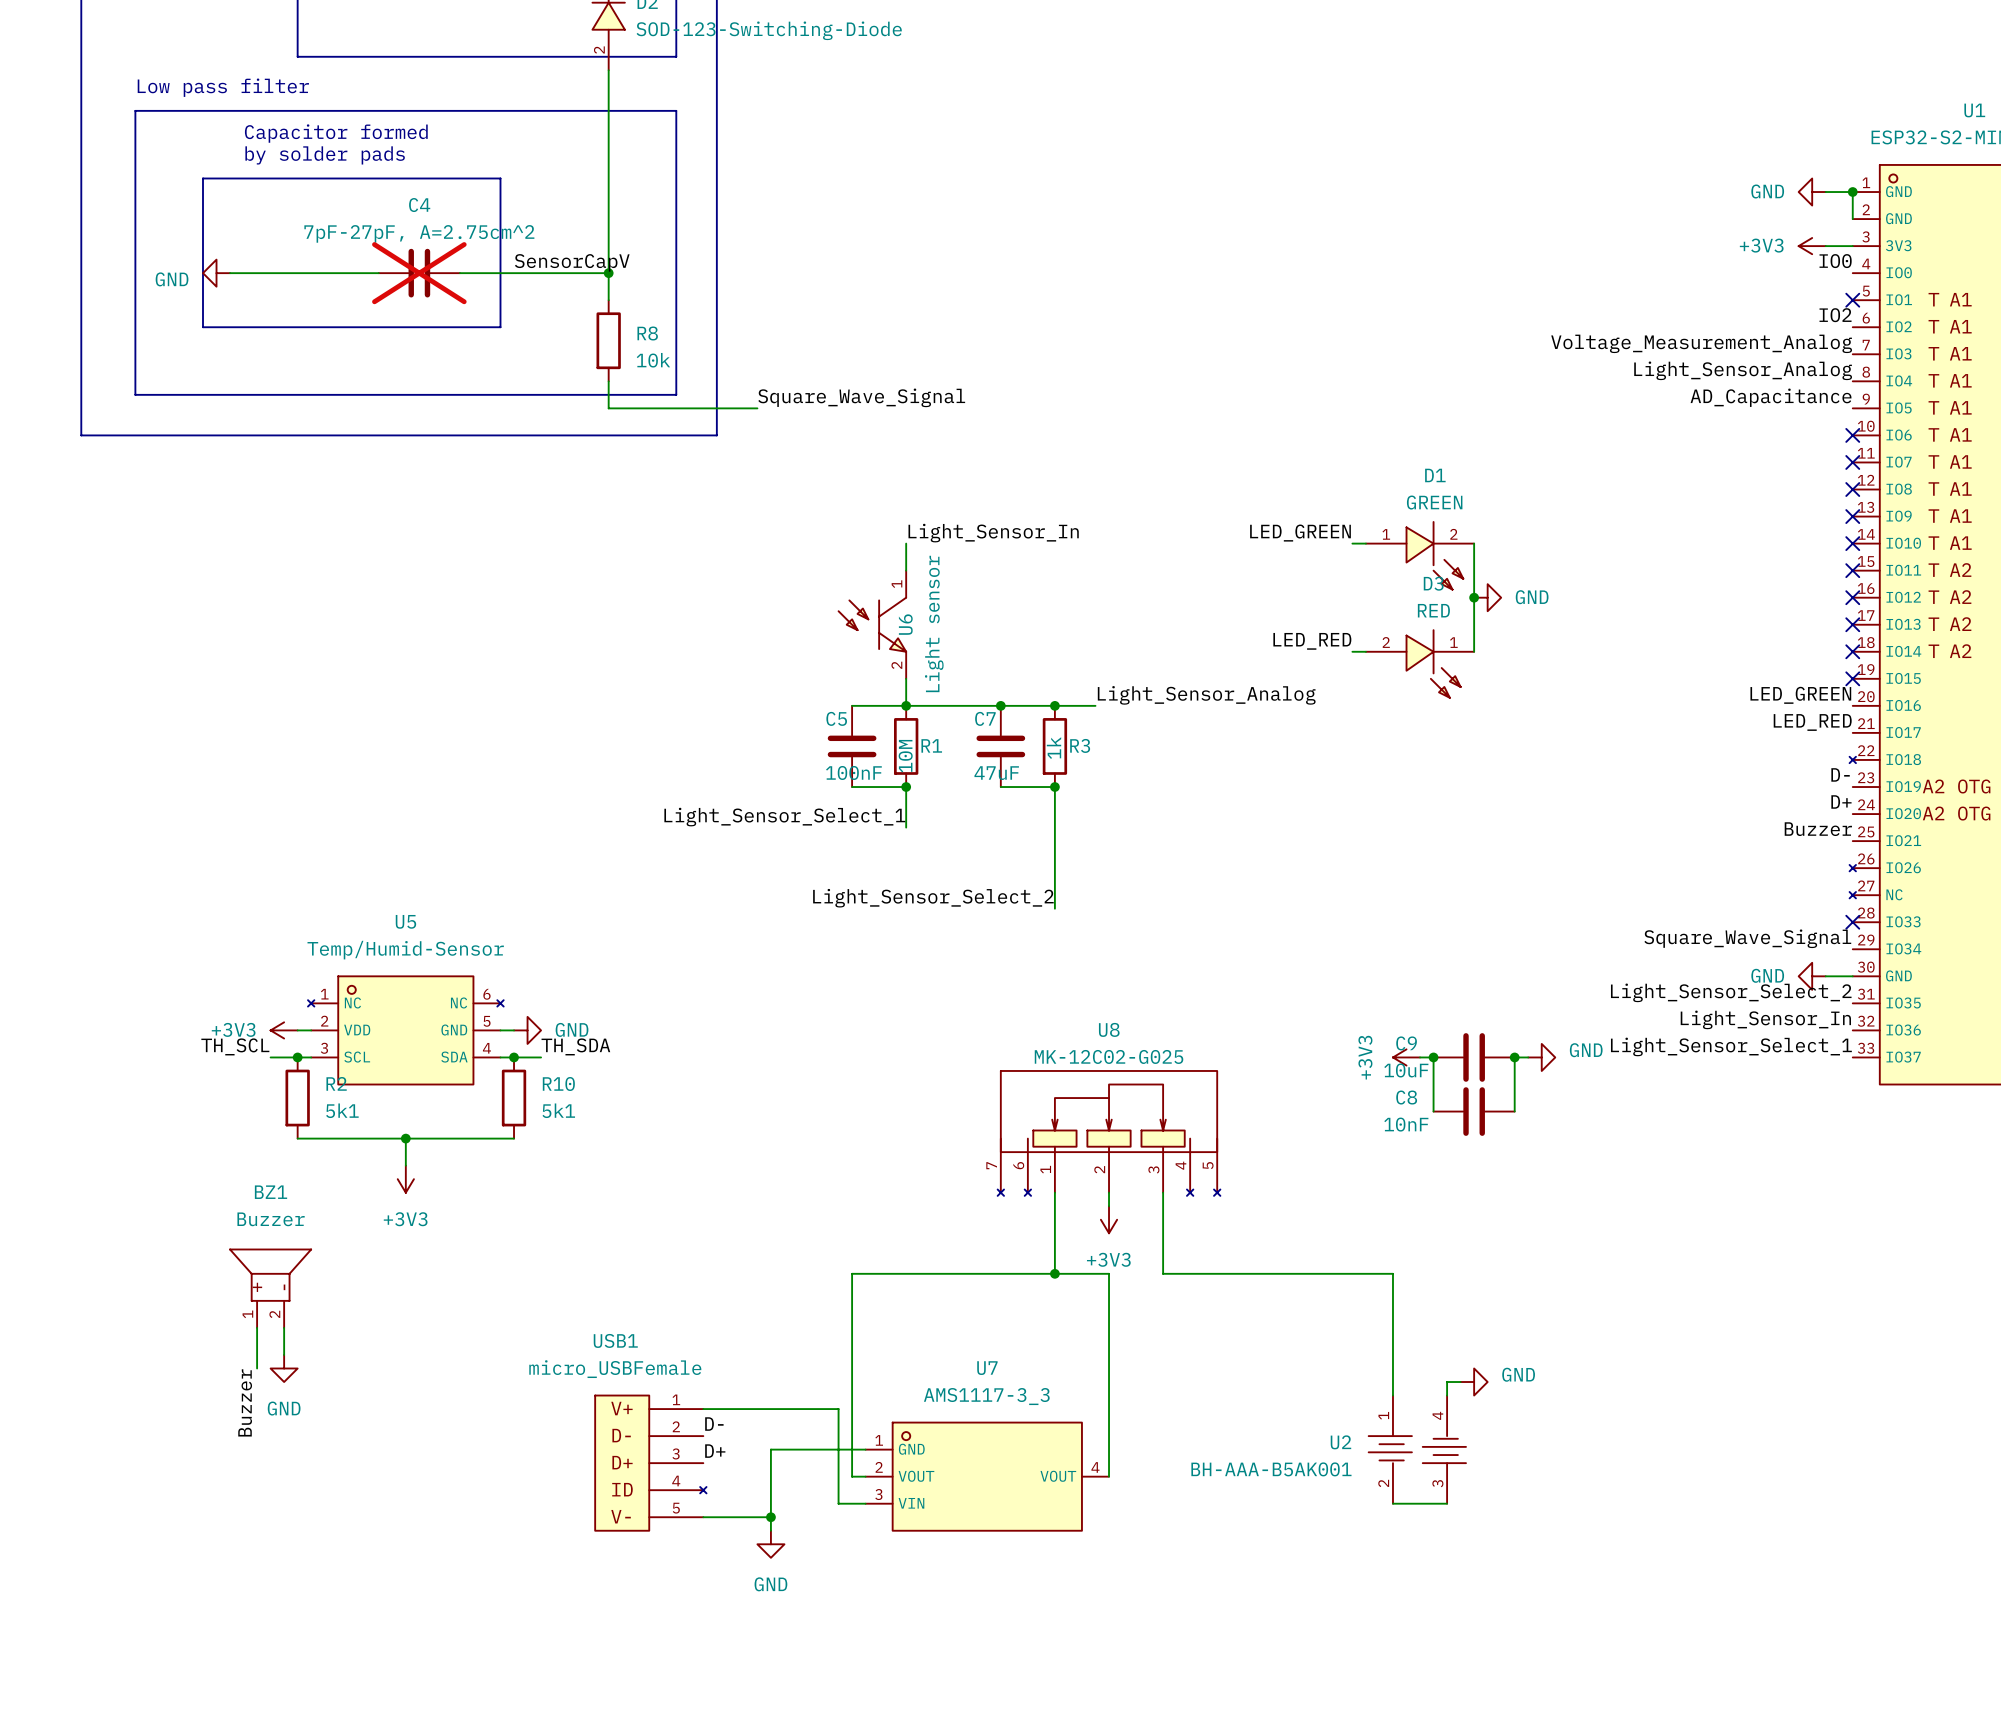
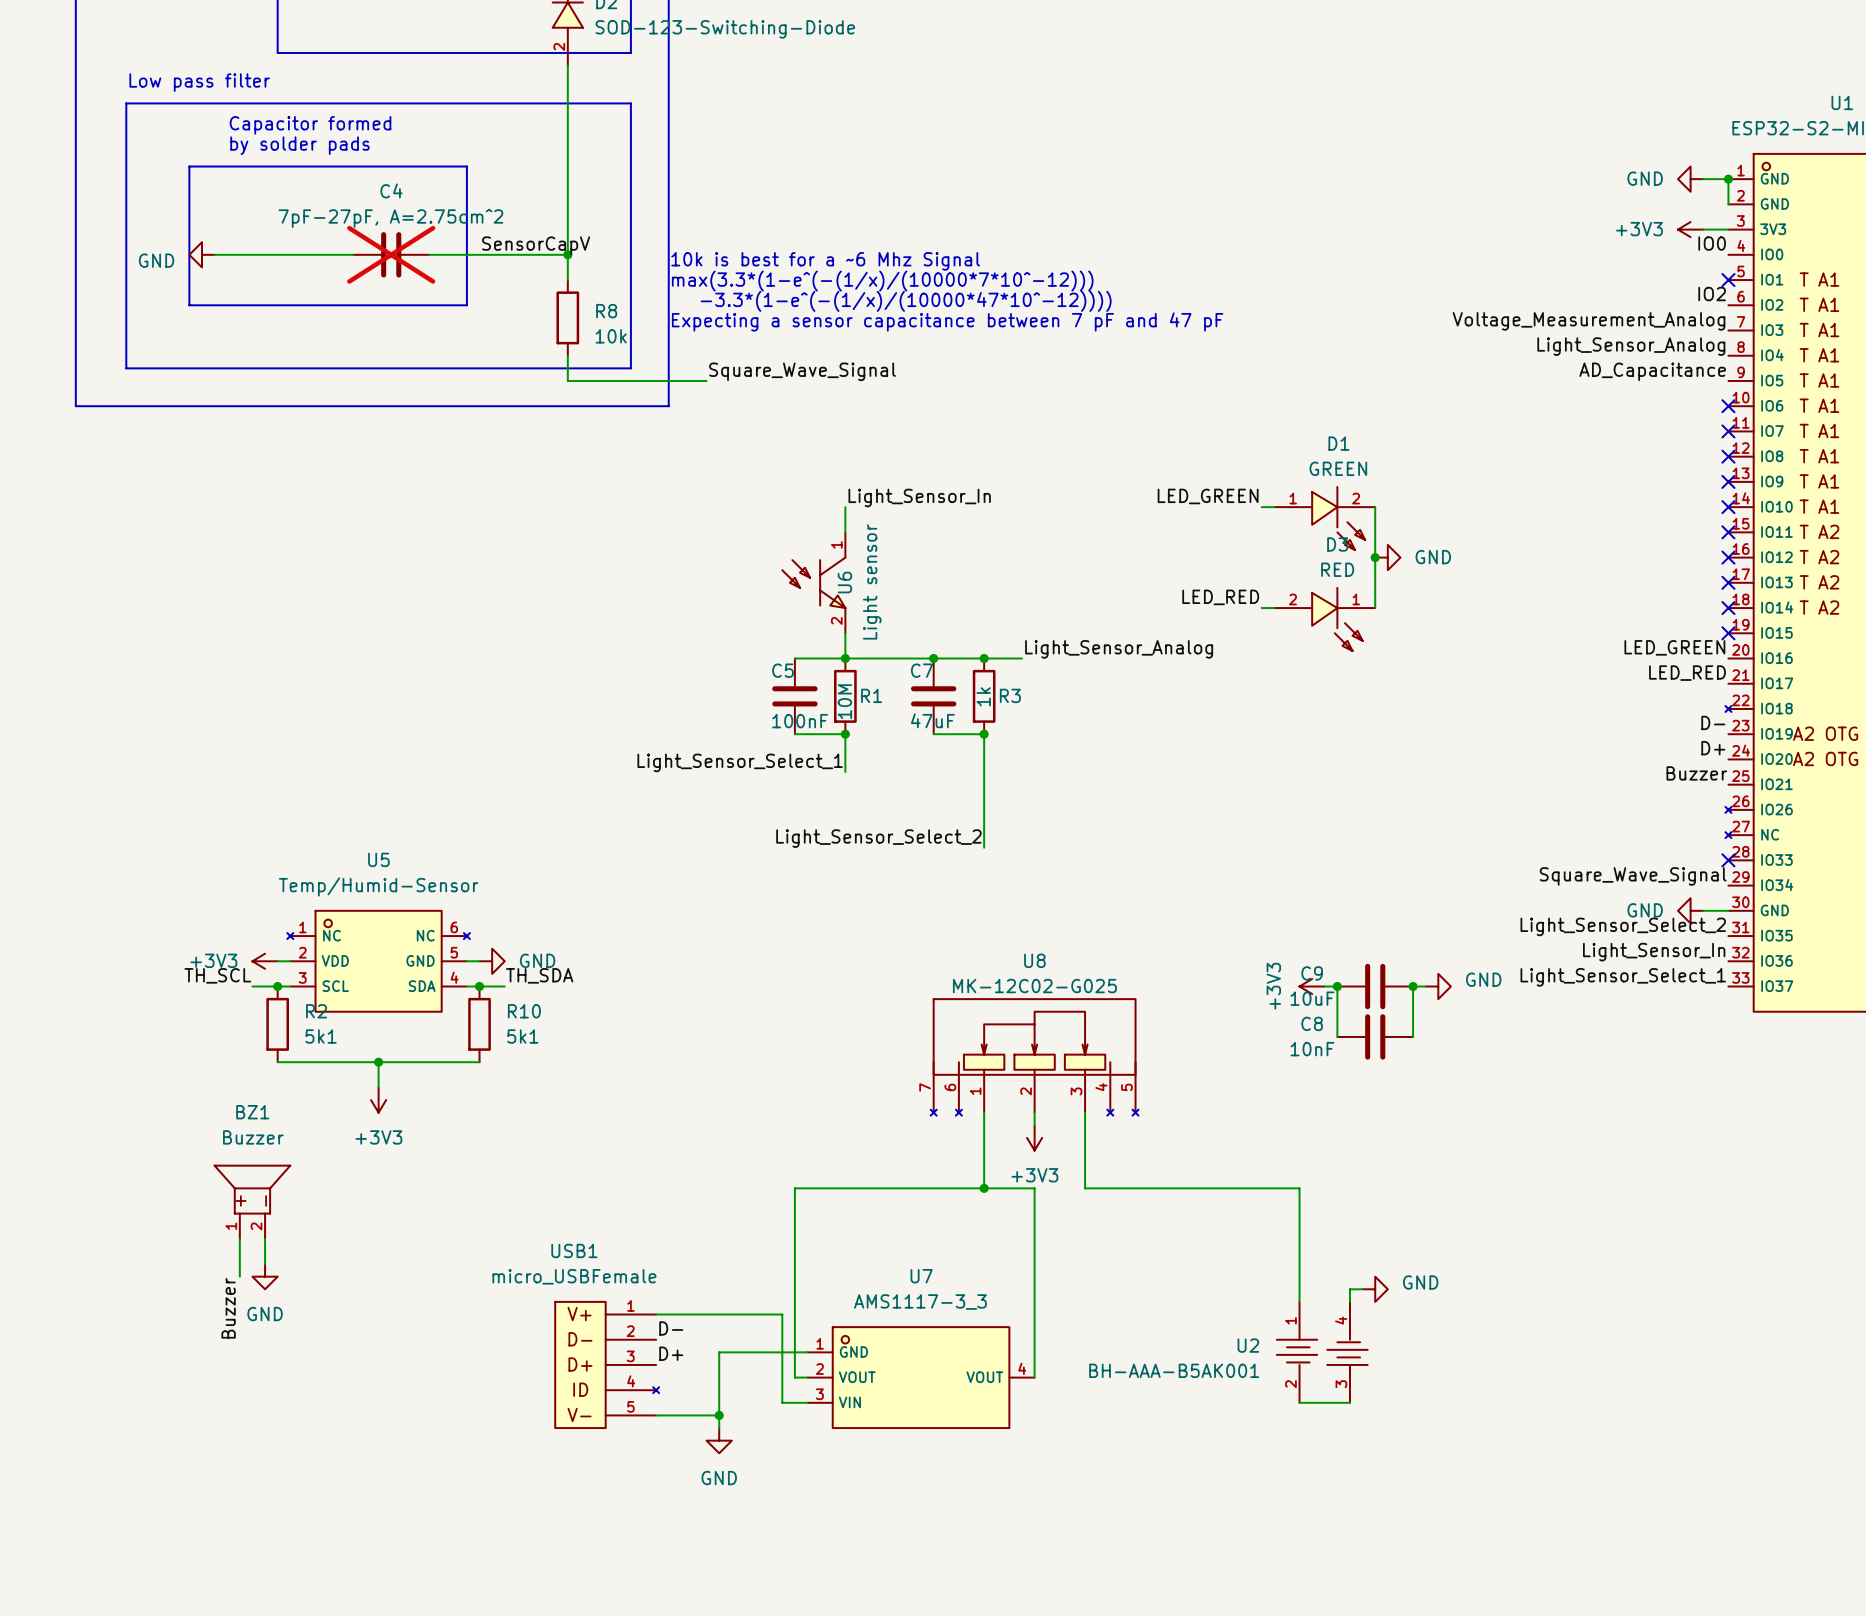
text: none -> 10k is best for a ~6 Mhz Signal (825, 261)
text: none -> max(3.3*(1-e^(-(1/x)/(10000*7*10^-12))) (882, 281)
text: none -> -3.3*(1-e^(-(1/x)/(10000*47*10^-12)))) (906, 301)
text: none -> Expecting a sensor capacitance between 7 pF and 47 pF (947, 321)

